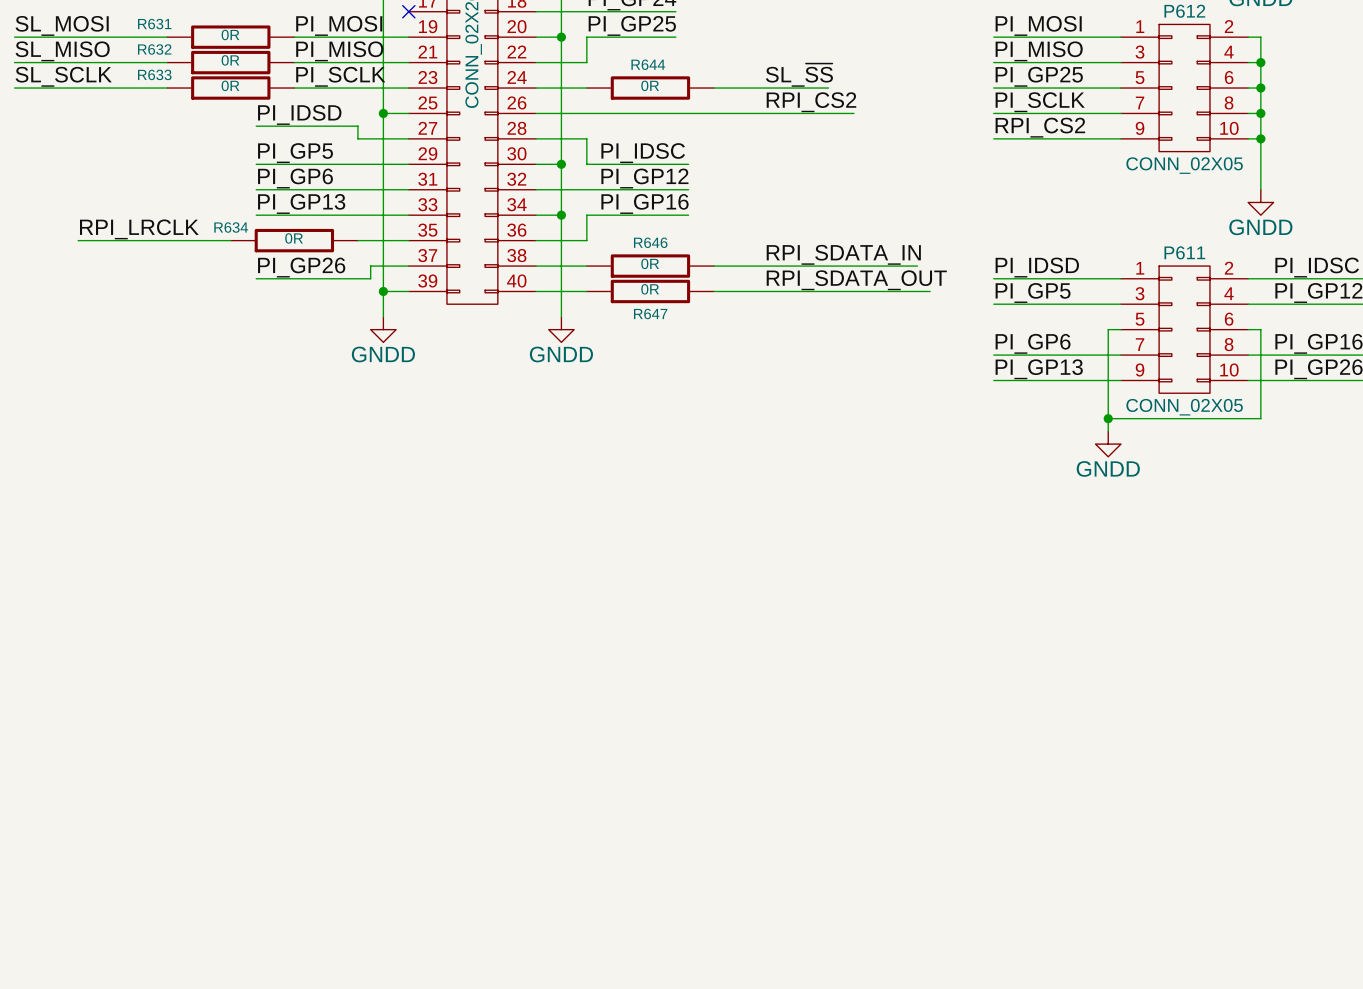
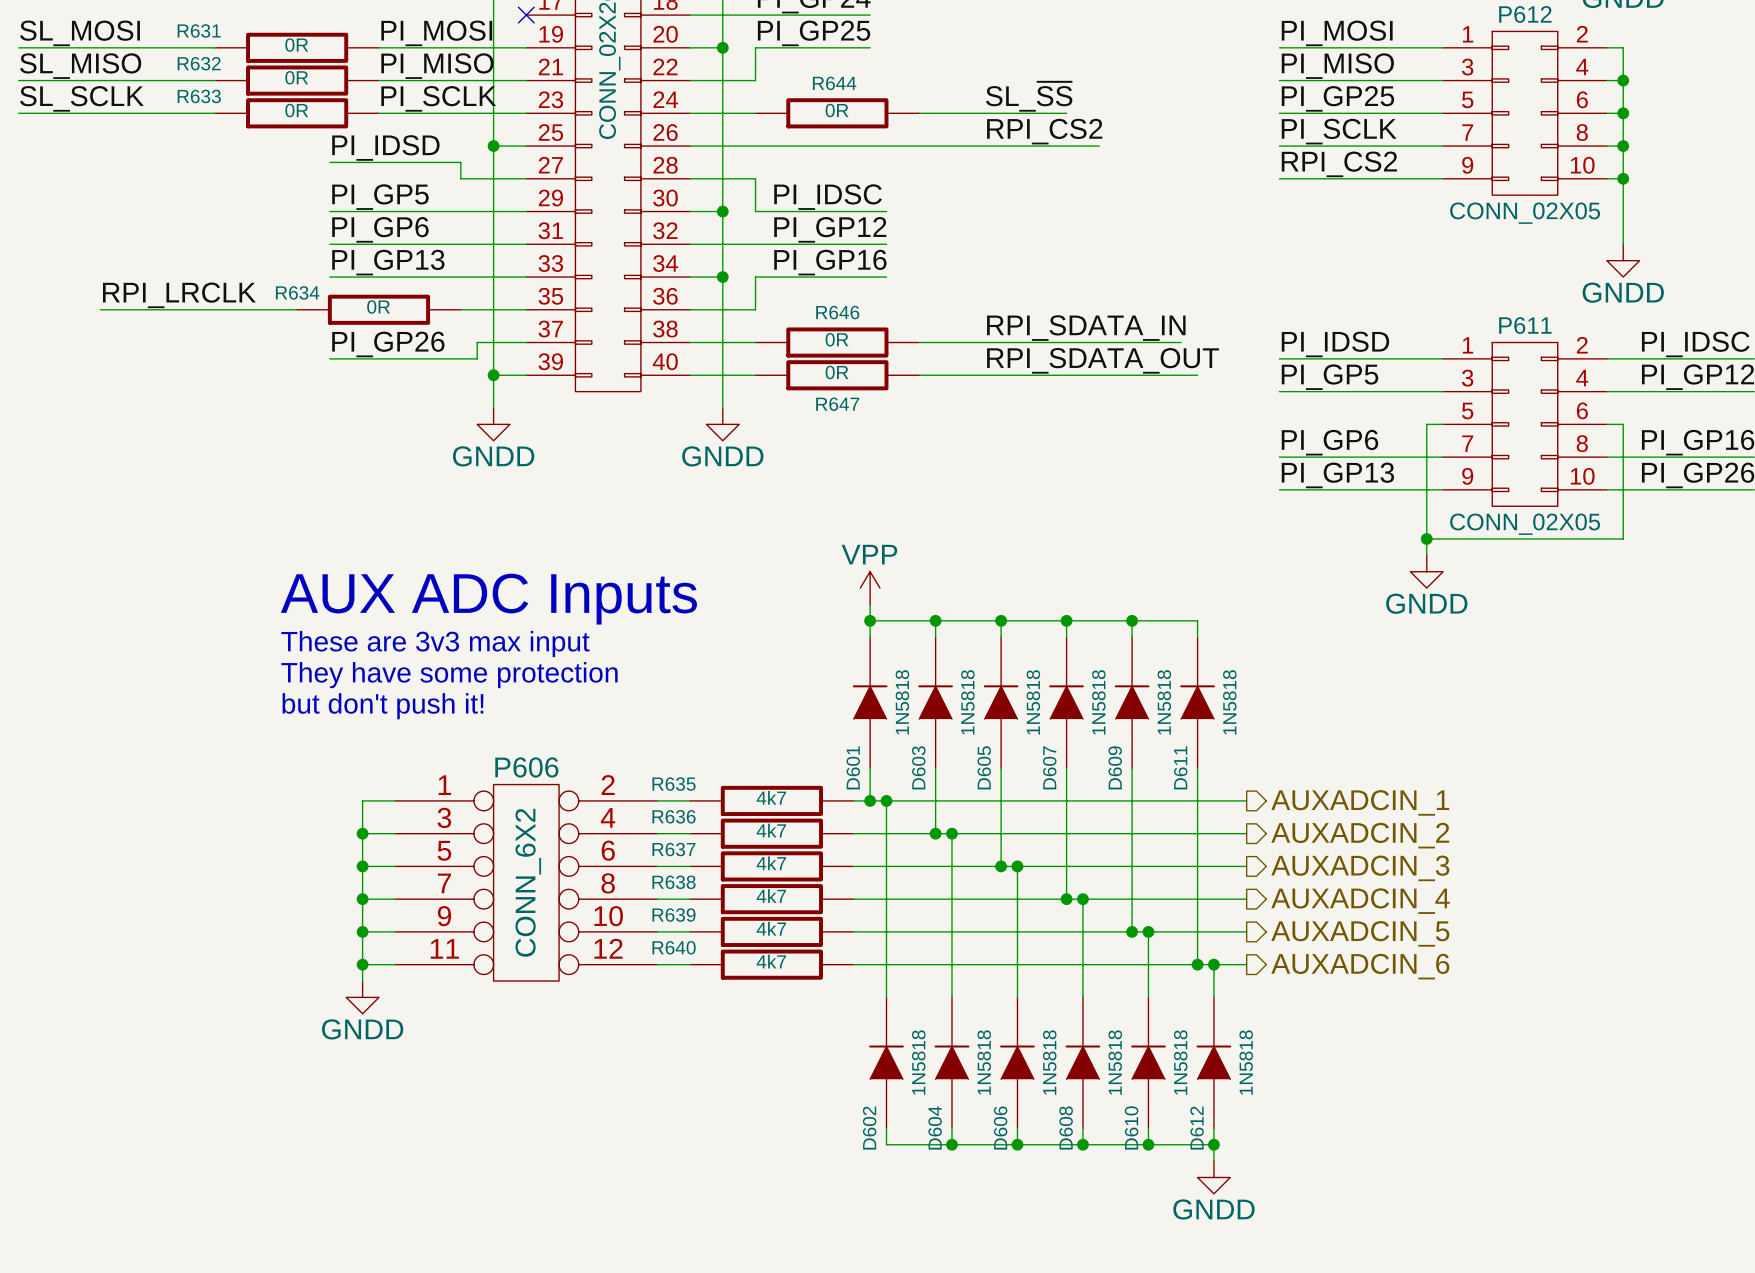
power symbol: none -> VPP (870, 588)
text: none -> AUX ADC Inputs (488, 599)
wire: none -> (870, 604) (870, 637)
wire: none -> (870, 620) (1197, 620) (1197, 637)
junction: none -> (870, 620)
wire: none -> (935, 620) (935, 637)
junction: none -> (935, 620)
wire: none -> (1001, 620) (1001, 637)
junction: none -> (1001, 620)
wire: none -> (1066, 620) (1066, 637)
junction: none -> (1066, 620)
wire: none -> (1132, 620) (1132, 637)
junction: none -> (1132, 620)
text: none -> These are 3v3 max input (435, 644)
text: none -> They have some protection (449, 675)
D601: none -> 1N5818 (870, 702)
D603: none -> 1N5818 (935, 702)
D605: none -> 1N5818 (1001, 702)
D607: none -> 1N5818 (1066, 702)
D609: none -> 1N5818 (1132, 702)
D611: none -> 1N5818 (1197, 702)
text: none -> but don't push it! (382, 706)
wire: none -> (870, 768) (870, 800)
wire: none -> (935, 768) (935, 833)
wire: none -> (1001, 768) (1001, 866)
wire: none -> (1066, 768) (1066, 899)
wire: none -> (1132, 768) (1132, 931)
wire: none -> (1197, 768) (1197, 964)
wire: none -> (395, 800) (362, 800) (362, 981)
wire: none -> (657, 800) (690, 800)
R635: none -> 4k7 (771, 800)
wire: none -> (853, 800) (1246, 800)
junction: none -> (870, 800)
wire: none -> (886, 800) (886, 997)
junction: none -> (886, 800)
hierarchical label: none -> AUXADCIN_1 (1360, 802)
wire: none -> (362, 833) (395, 833)
junction: none -> (362, 833)
wire: none -> (657, 833) (690, 833)
R636: none -> 4k7 (771, 833)
wire: none -> (853, 833) (1246, 833)
junction: none -> (935, 833)
wire: none -> (951, 833) (951, 997)
junction: none -> (951, 833)
hierarchical label: none -> AUXADCIN_2 (1360, 835)
wire: none -> (362, 866) (395, 866)
junction: none -> (362, 866)
wire: none -> (657, 866) (690, 866)
R637: none -> 4k7 (771, 866)
wire: none -> (853, 866) (1246, 866)
junction: none -> (1001, 866)
wire: none -> (1017, 866) (1017, 997)
junction: none -> (1017, 866)
hierarchical label: none -> AUXADCIN_3 (1360, 868)
P606: none -> CONN_6X2 (526, 882)
wire: none -> (362, 899) (395, 899)
junction: none -> (362, 899)
wire: none -> (657, 899) (690, 899)
R638: none -> 4k7 (771, 899)
wire: none -> (853, 899) (1246, 899)
junction: none -> (1066, 899)
wire: none -> (1082, 899) (1082, 997)
junction: none -> (1082, 899)
hierarchical label: none -> AUXADCIN_4 (1360, 901)
wire: none -> (362, 931) (395, 931)
junction: none -> (362, 931)
wire: none -> (657, 931) (690, 931)
R639: none -> 4k7 (771, 931)
wire: none -> (853, 931) (1246, 931)
junction: none -> (1132, 931)
wire: none -> (1148, 931) (1148, 997)
junction: none -> (1148, 931)
hierarchical label: none -> AUXADCIN_5 (1360, 933)
wire: none -> (362, 964) (395, 964)
junction: none -> (362, 964)
wire: none -> (657, 964) (690, 964)
R640: none -> 4k7 (771, 964)
wire: none -> (853, 964) (1246, 964)
junction: none -> (1197, 964)
wire: none -> (1213, 964) (1213, 997)
junction: none -> (1213, 964)
hierarchical label: none -> AUXADCIN_6 (1360, 966)
power symbol: none -> GNDD (362, 997)
D602: none -> 1N5818 (886, 1062)
D604: none -> 1N5818 (951, 1062)
D606: none -> 1N5818 (1017, 1062)
D608: none -> 1N5818 (1082, 1062)
D610: none -> 1N5818 (1148, 1062)
D612: none -> 1N5818 (1213, 1062)
wire: none -> (886, 1128) (886, 1144) (1213, 1144)
wire: none -> (951, 1128) (951, 1144)
wire: none -> (1017, 1128) (1017, 1144)
wire: none -> (1082, 1128) (1082, 1144)
wire: none -> (1148, 1128) (1148, 1144)
wire: none -> (1213, 1128) (1213, 1161)
junction: none -> (951, 1144)
junction: none -> (1017, 1144)
junction: none -> (1082, 1144)
junction: none -> (1148, 1144)
junction: none -> (1213, 1144)
power symbol: none -> GNDD (1213, 1177)

